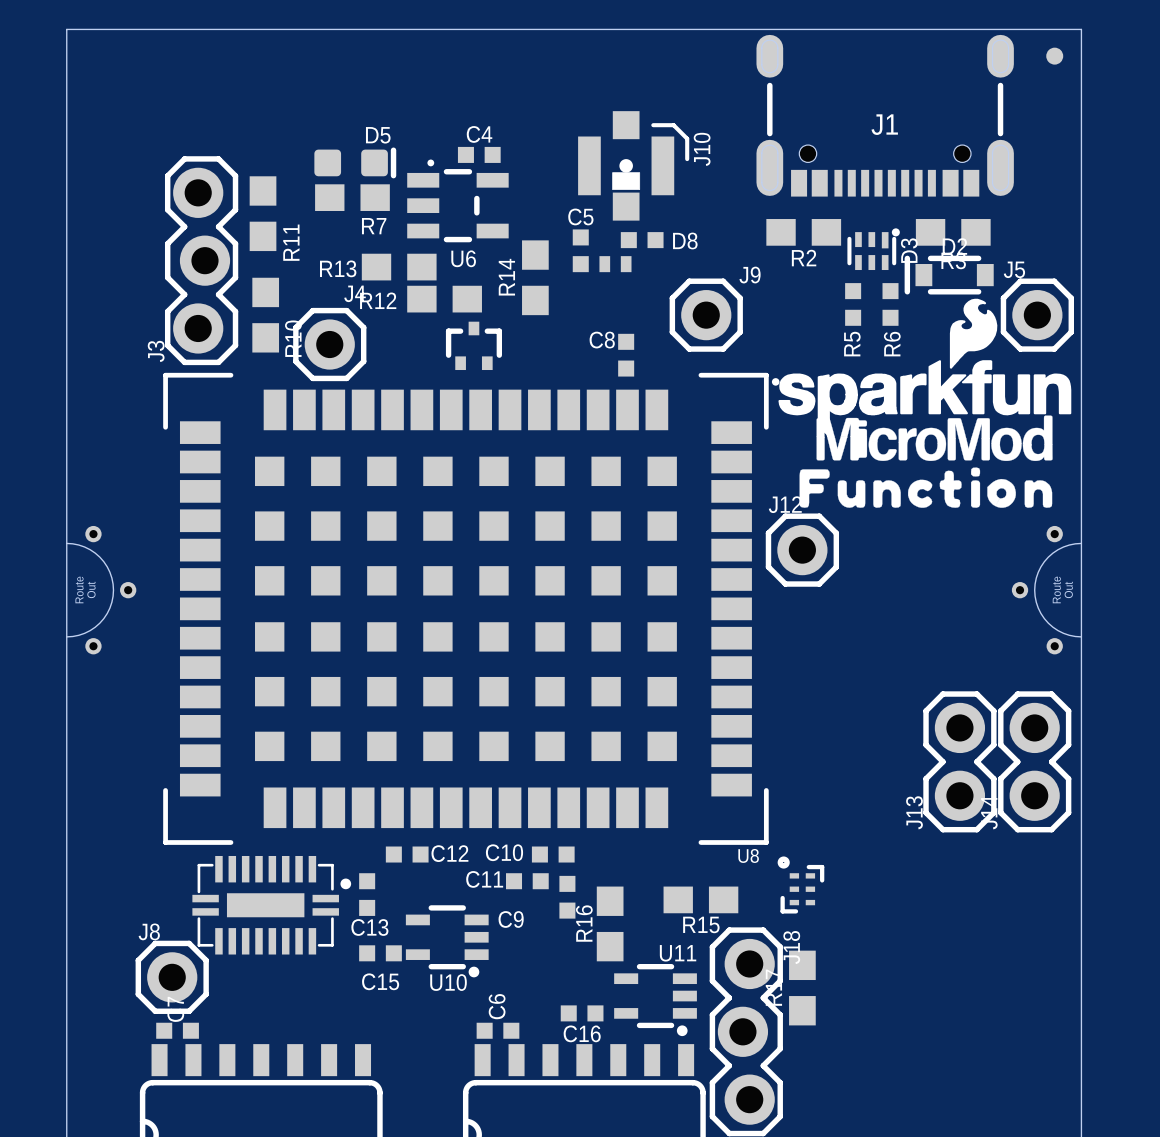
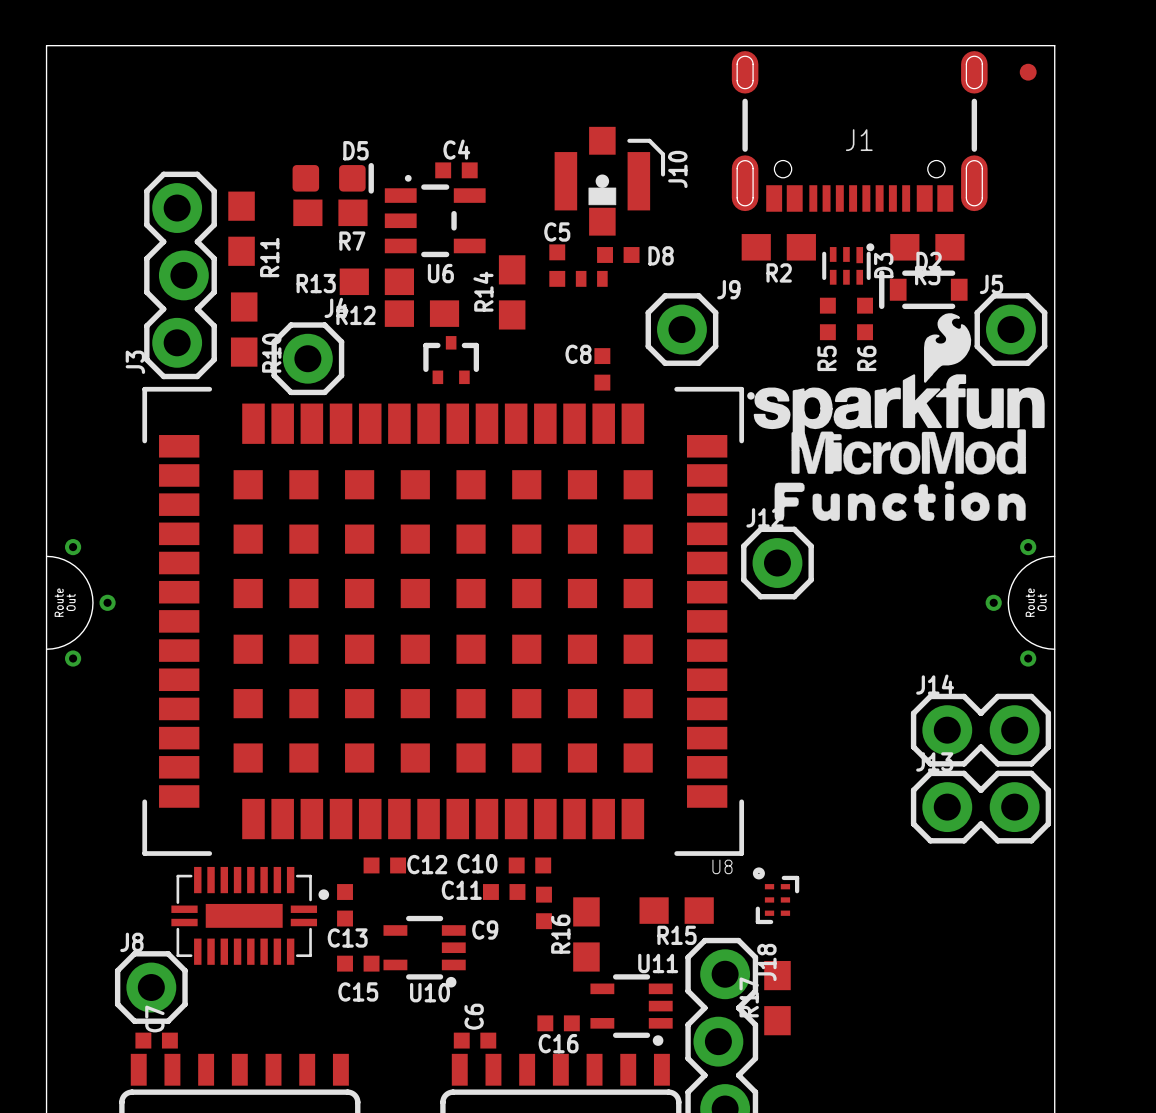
J13 rotation: 0° (959, 761) -> 90° clockwise (980, 807)
J14 rotation: 0° (1034, 761) -> 90° clockwise (980, 730)

